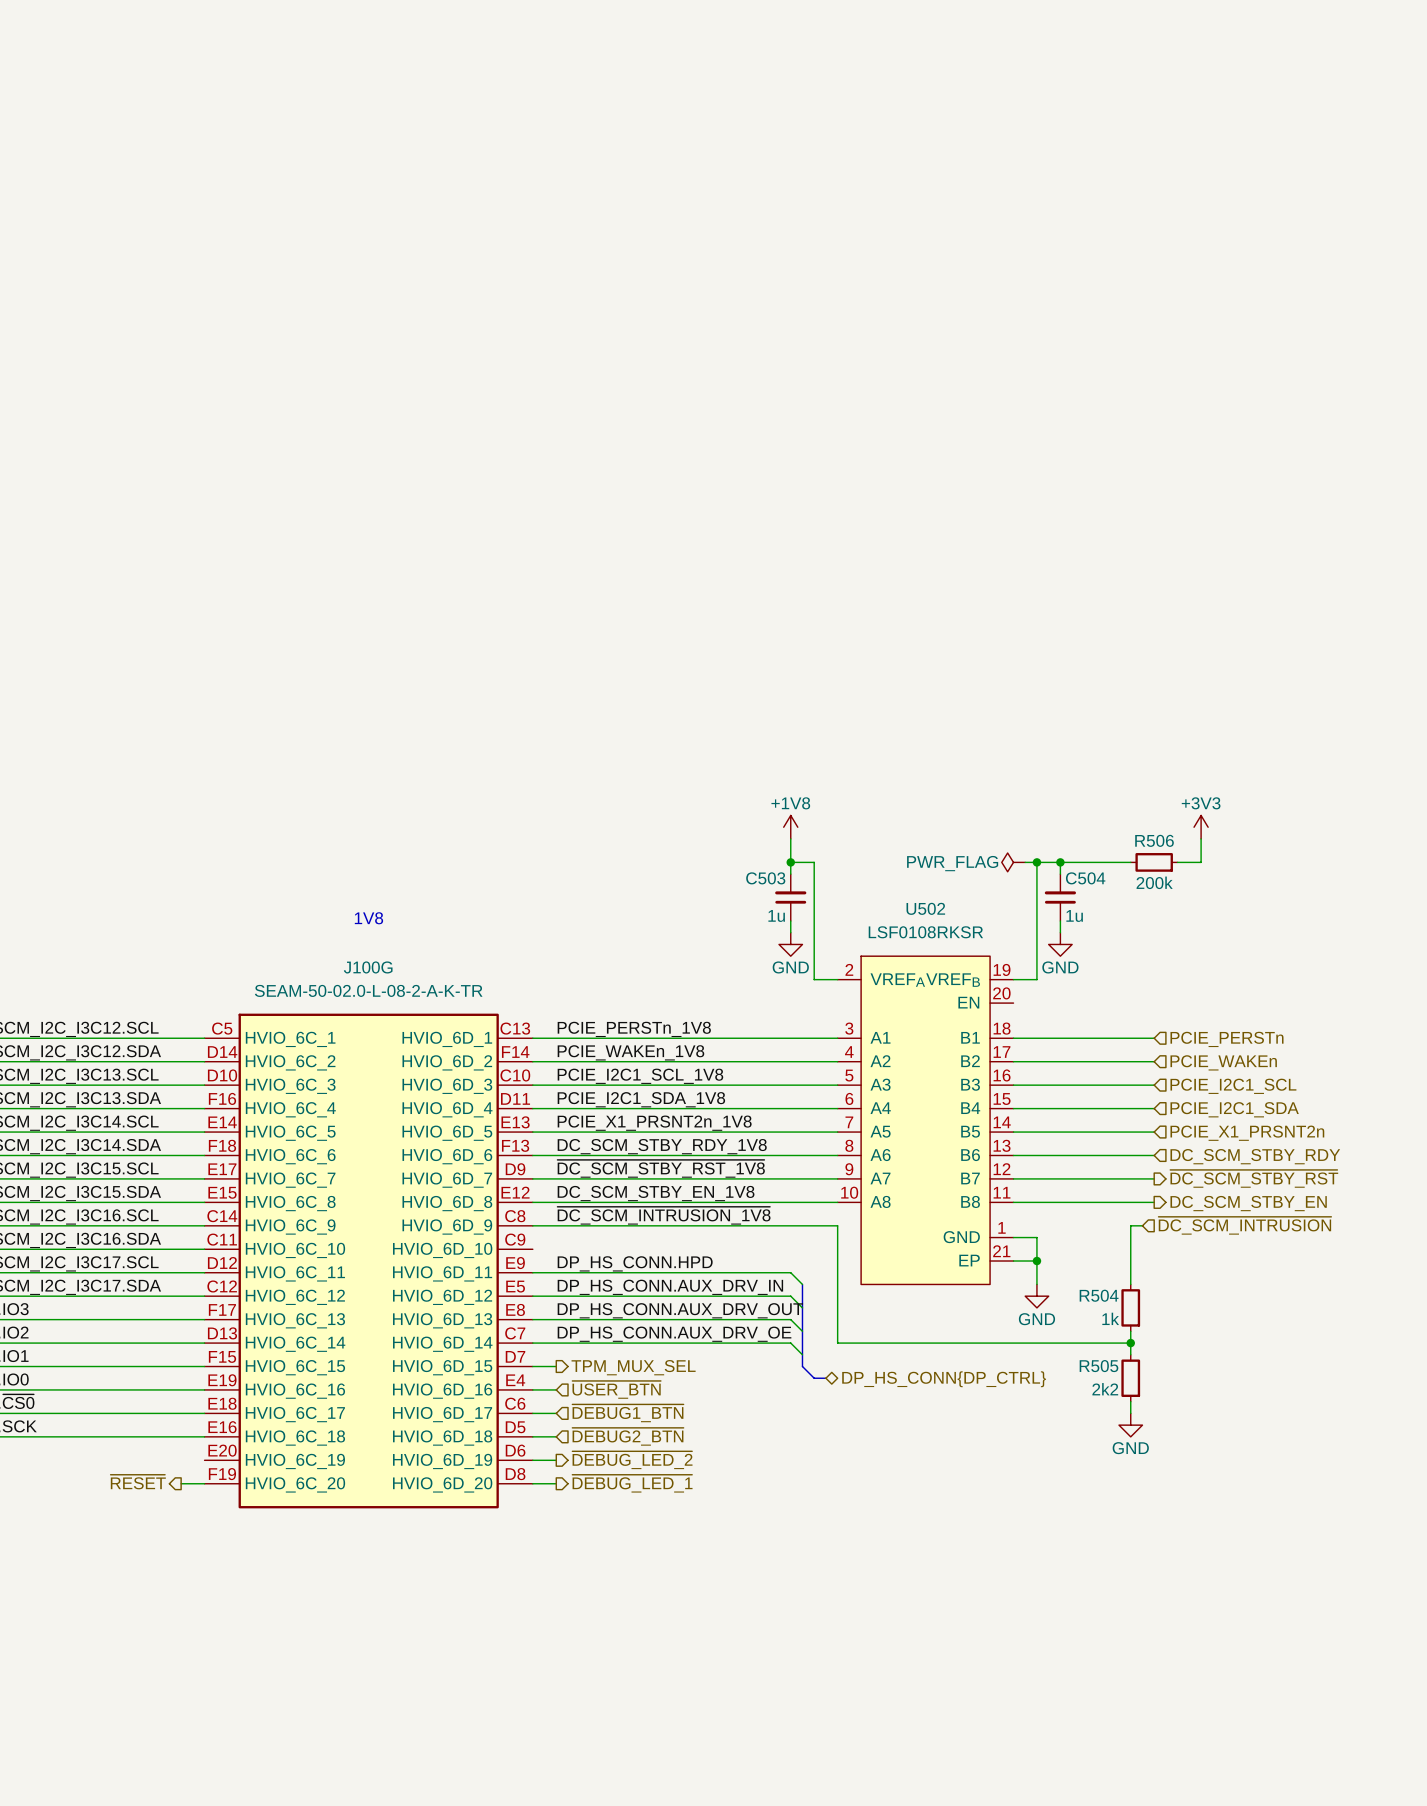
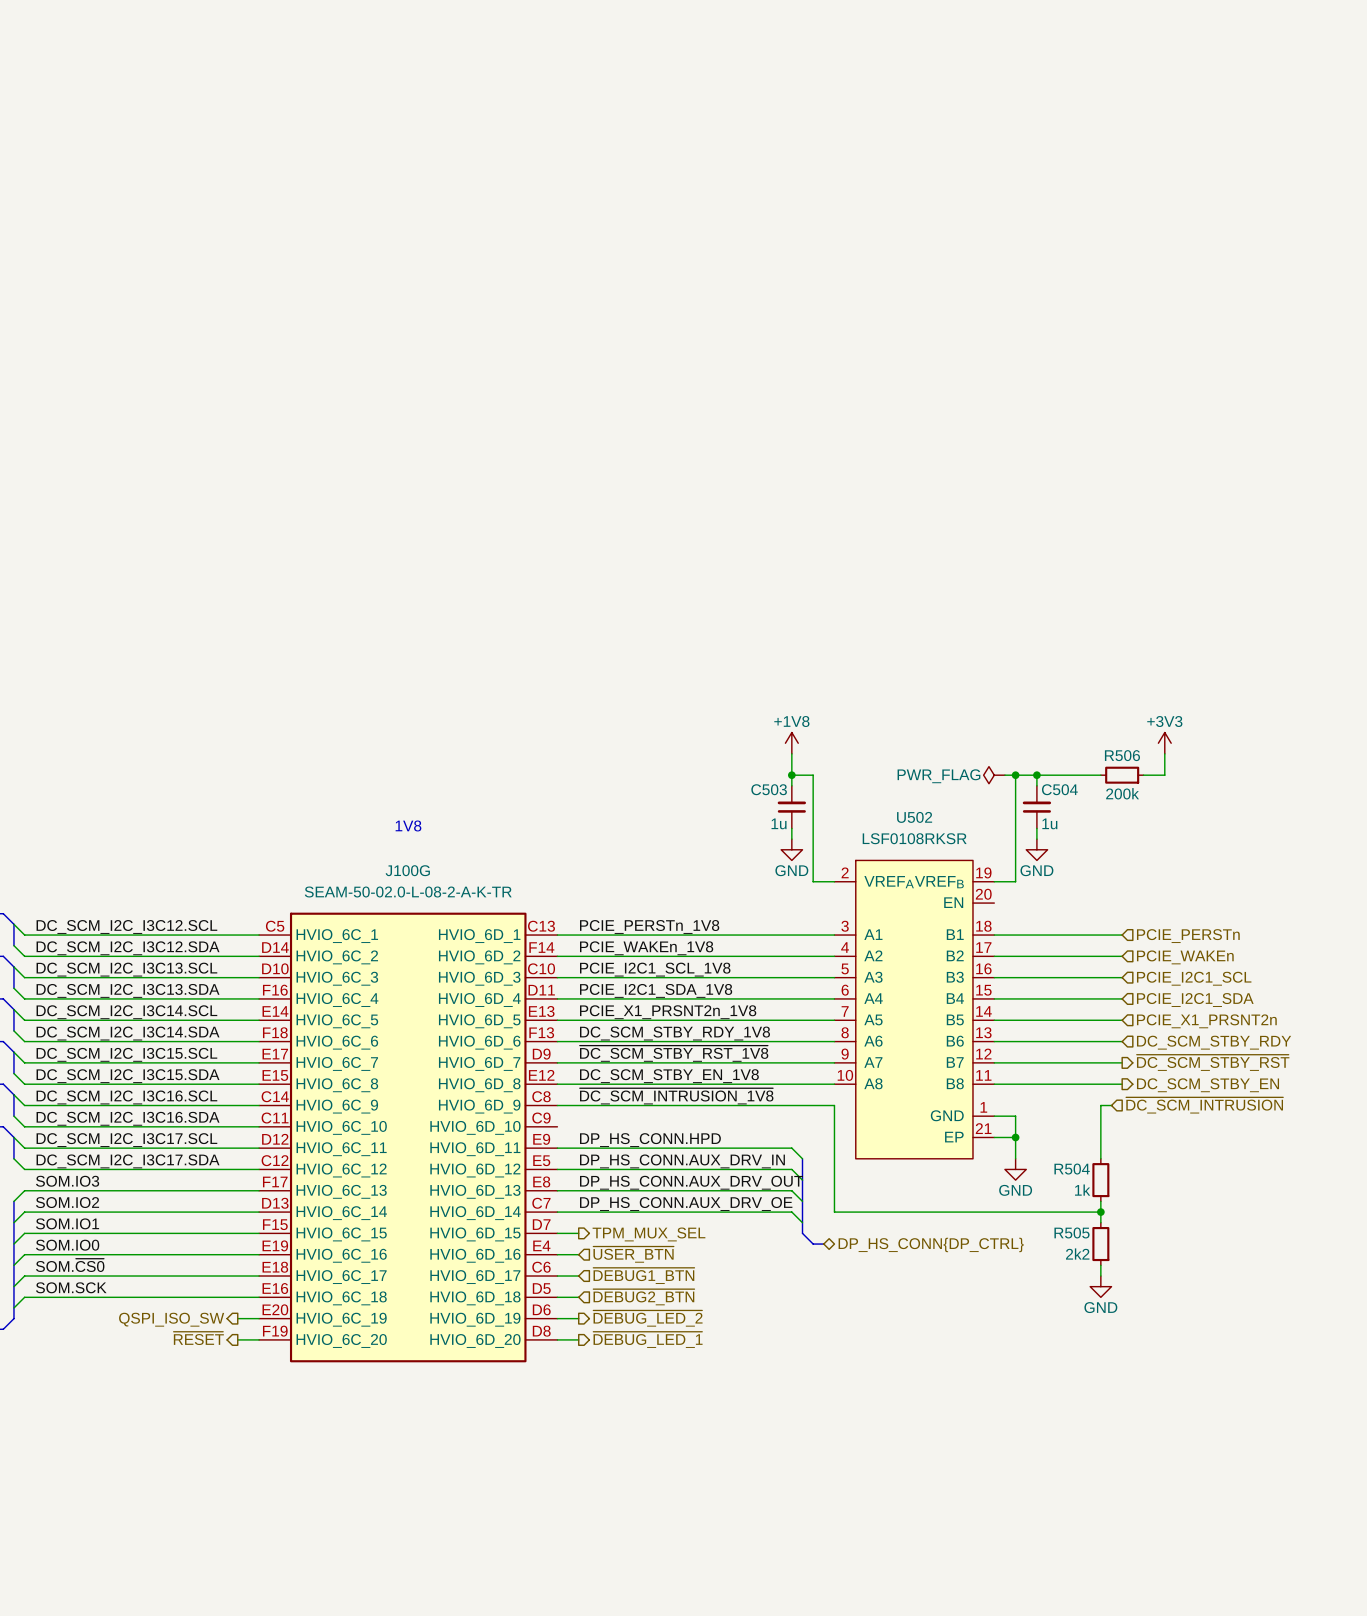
wire: none -> (237, 1318) (259, 1318)
hierarchical label: none -> QSPI_ISO_SW (171, 1319)

